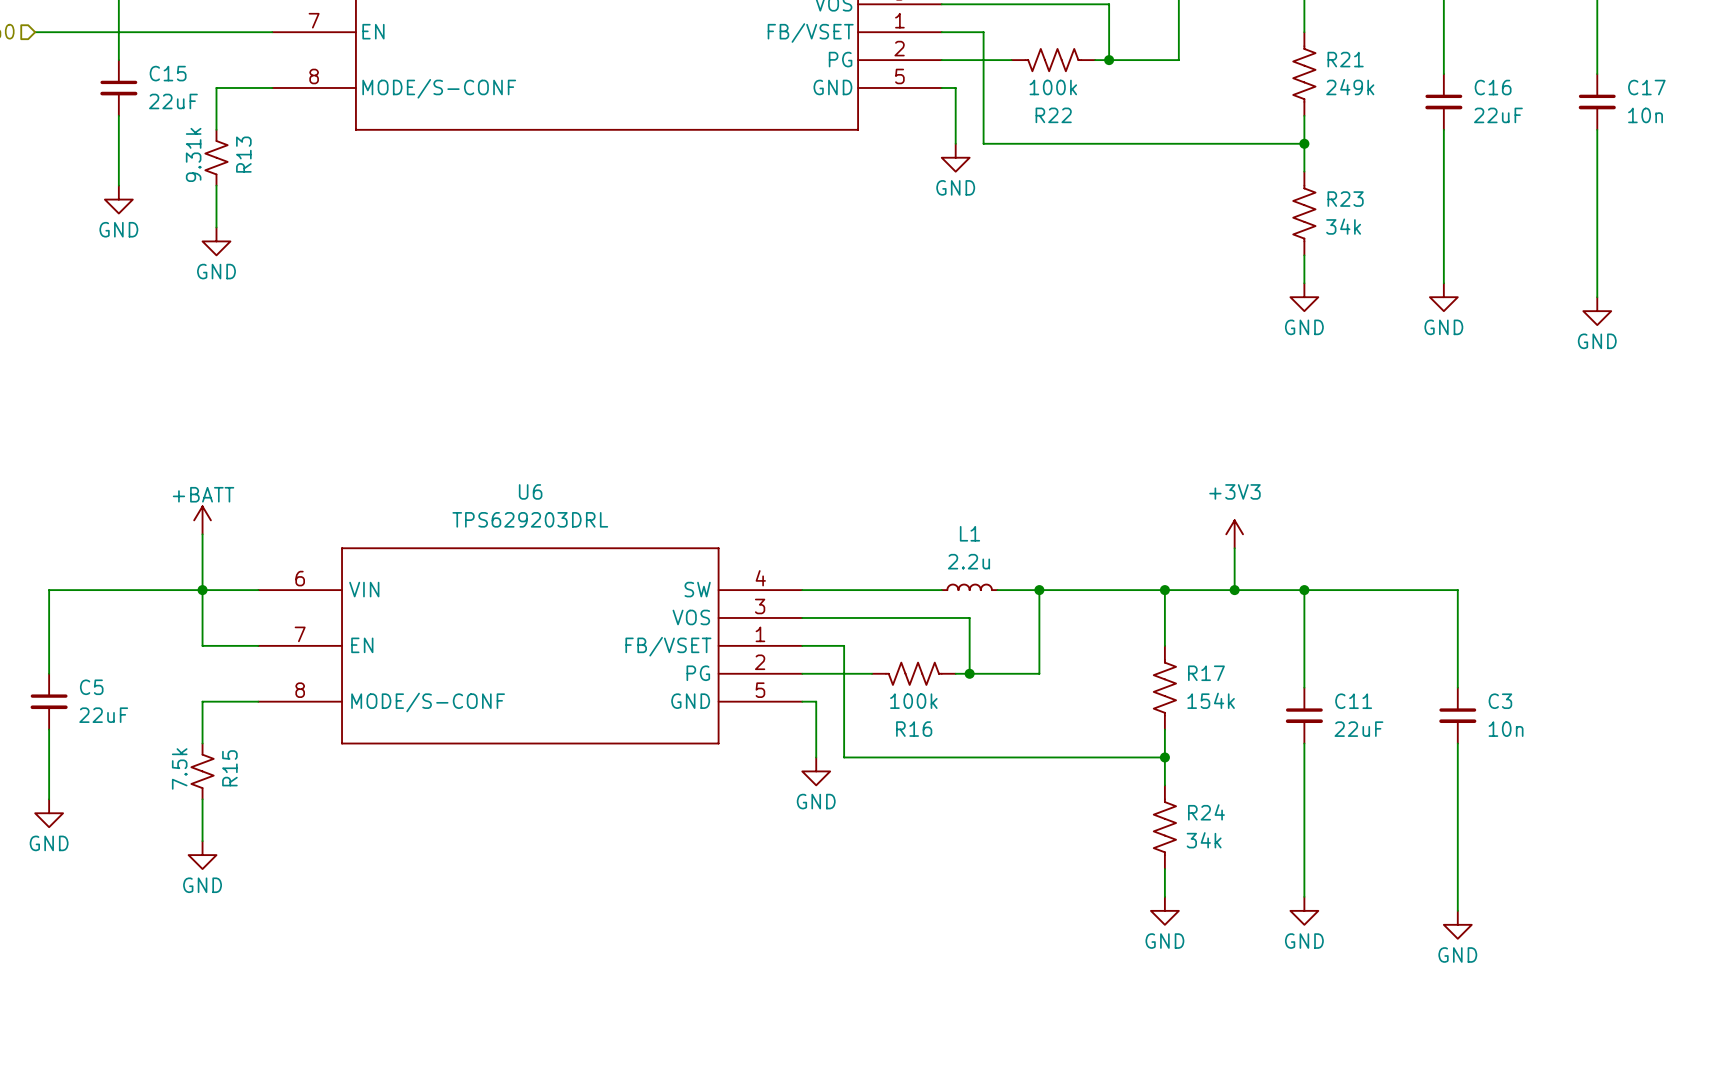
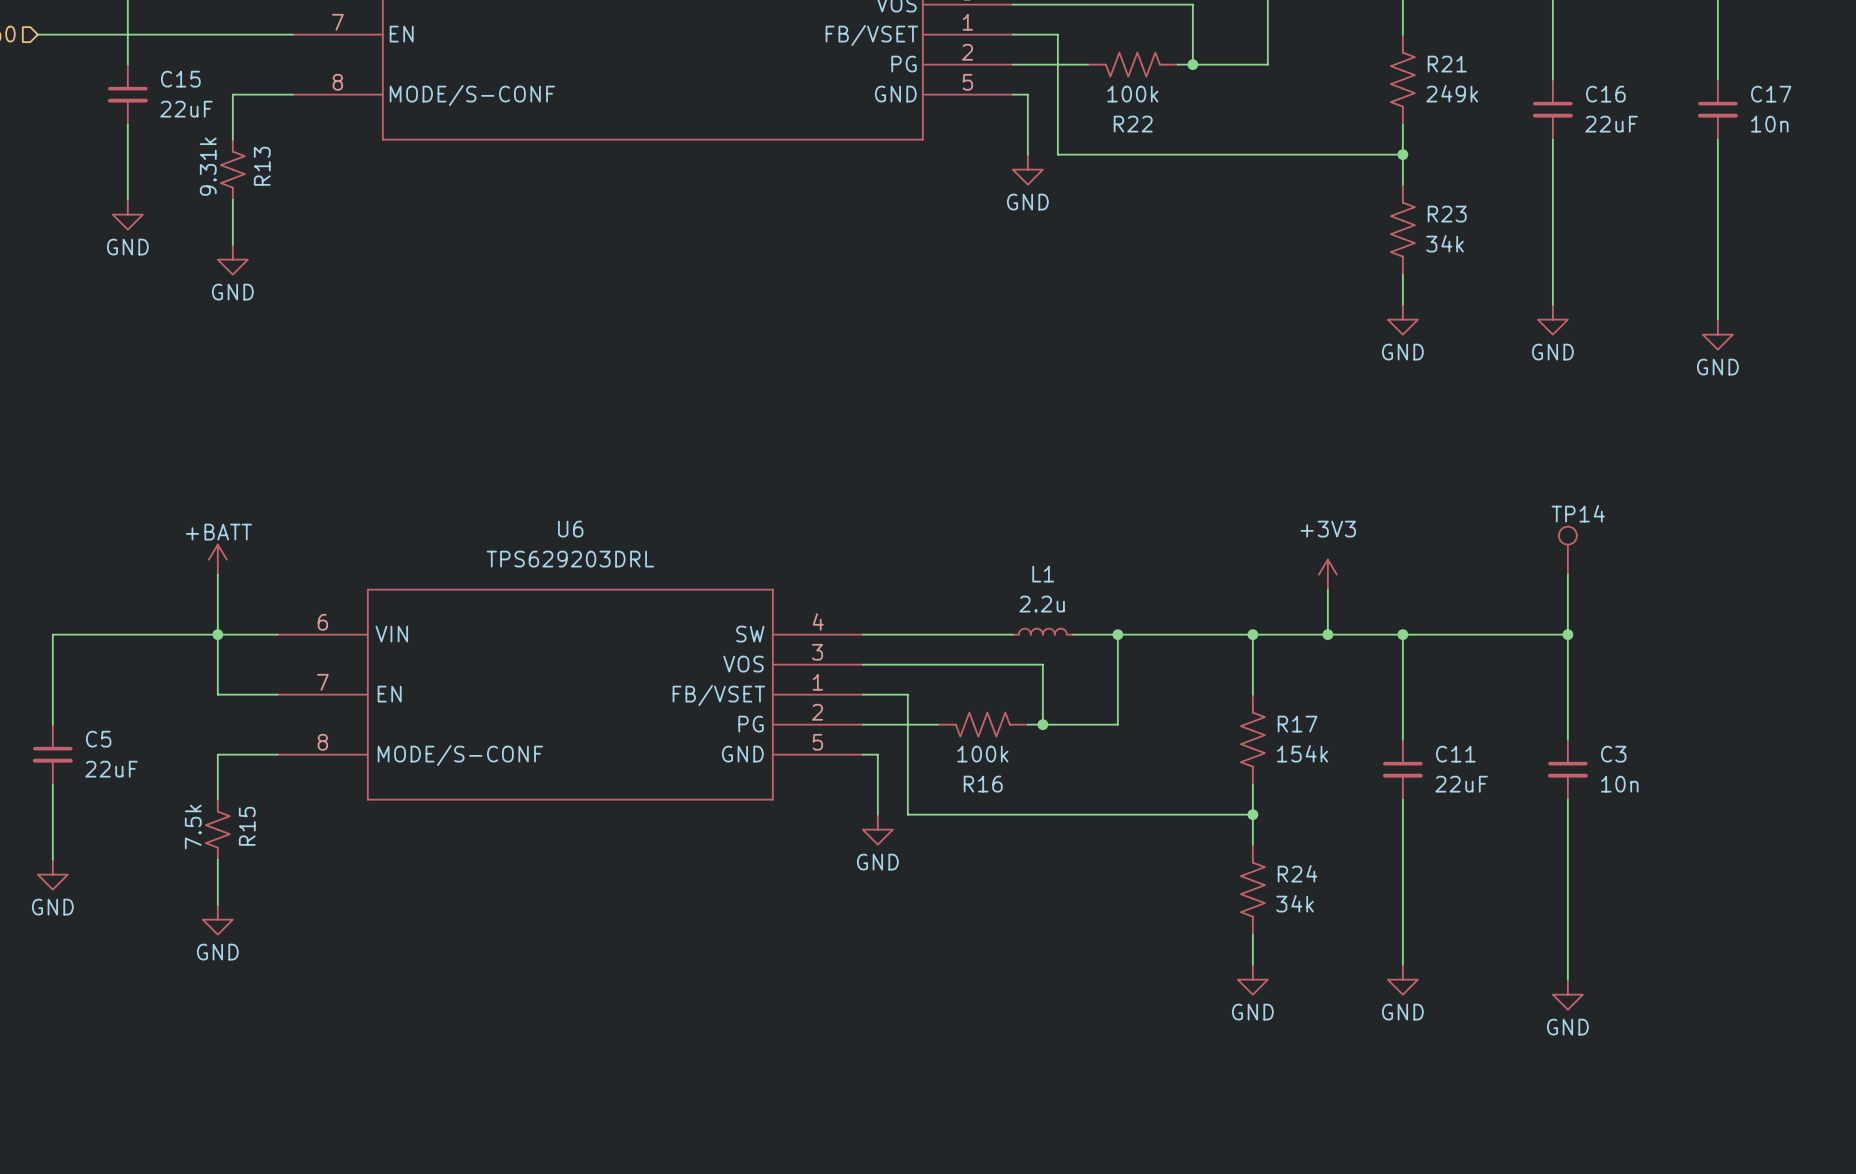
TP14: none -> (1567, 550)
wire: none -> (1567, 574) (1567, 634)
junction: none -> (1567, 634)

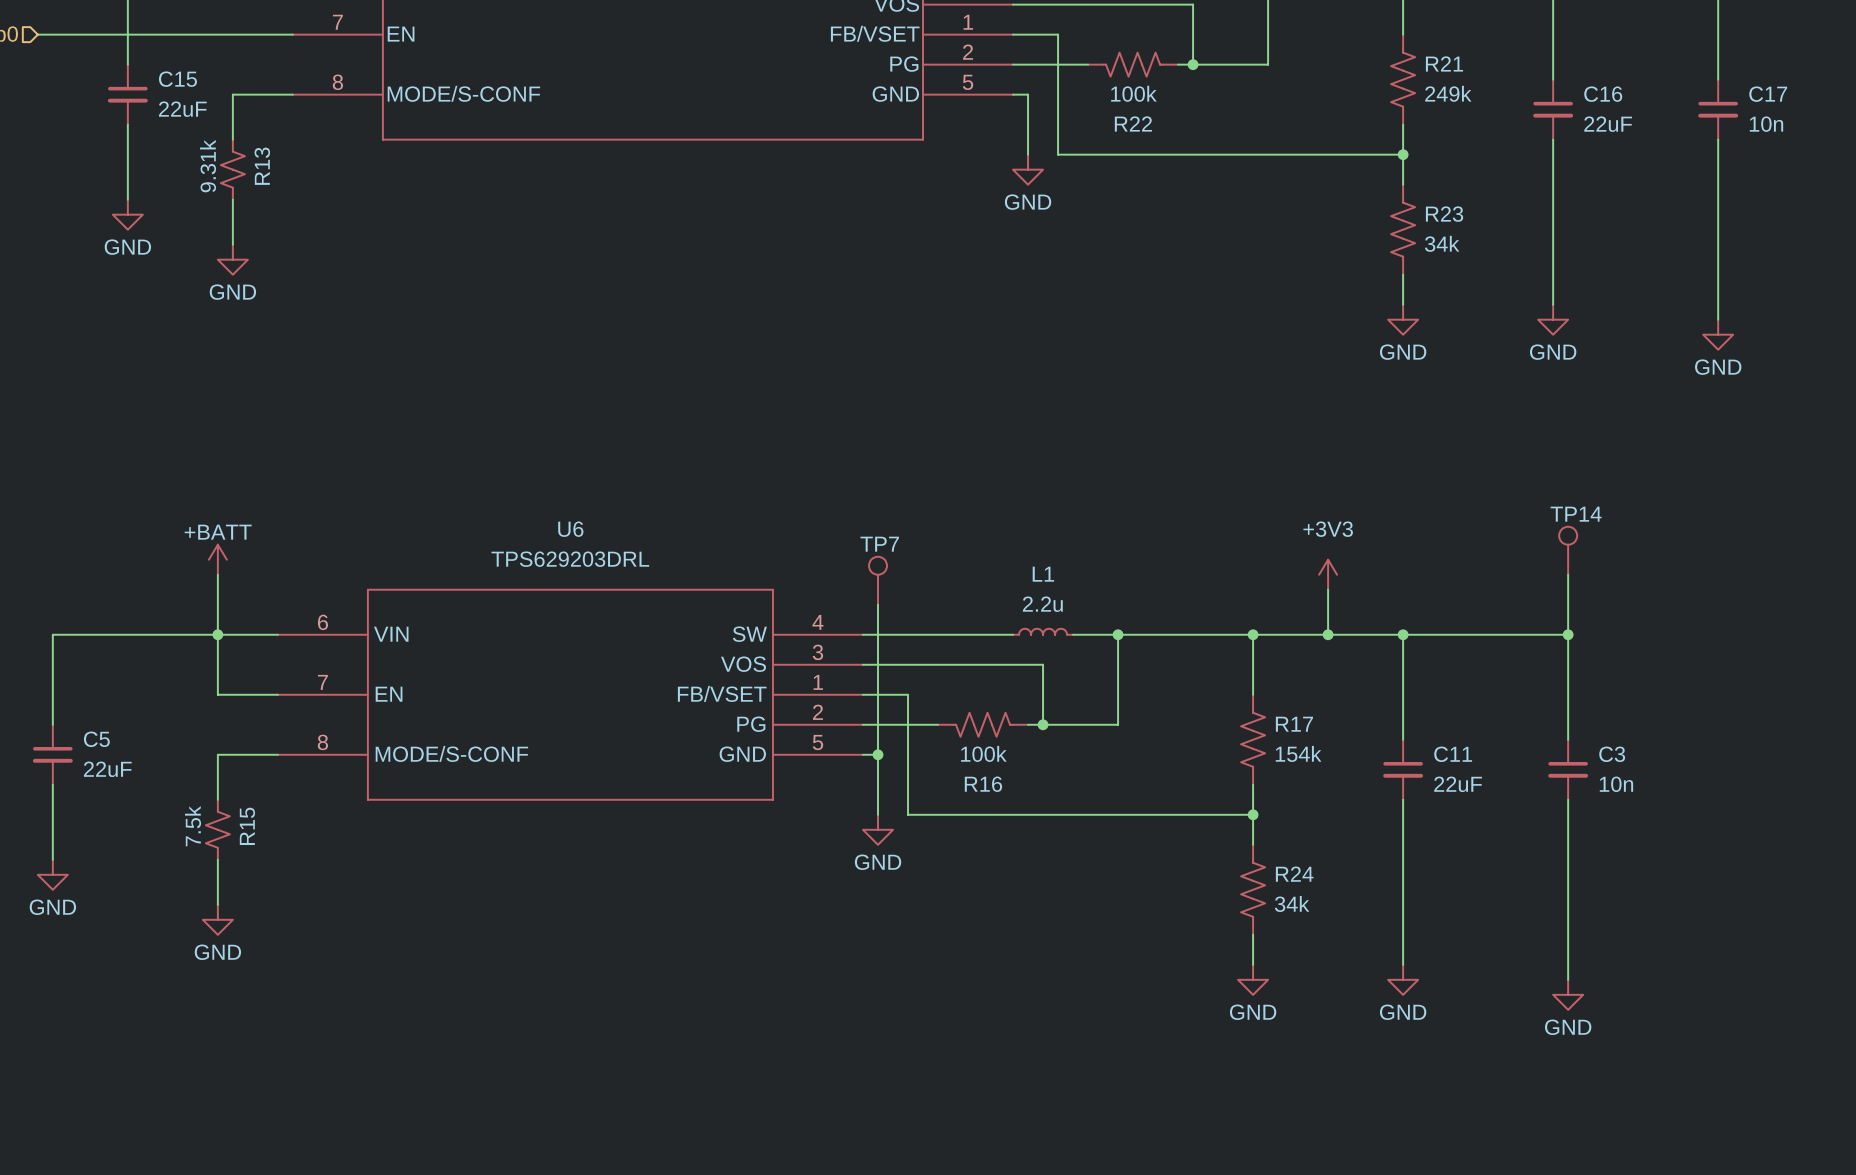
TP7: none -> (878, 580)
wire: none -> (878, 604) (878, 754)
junction: none -> (878, 754)

